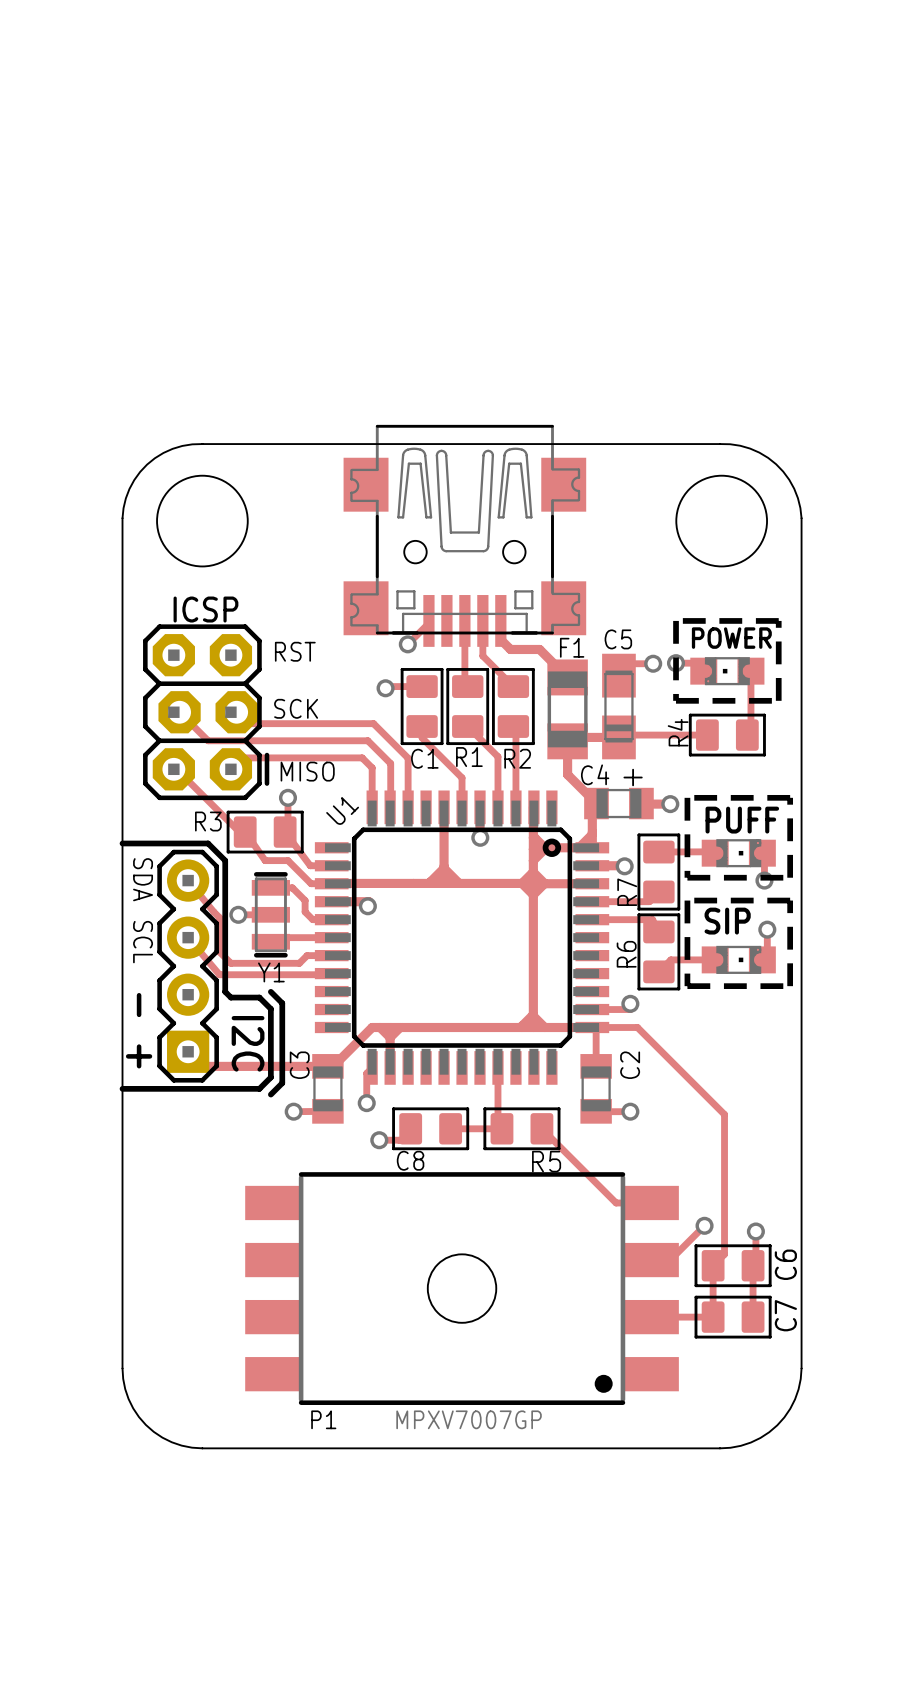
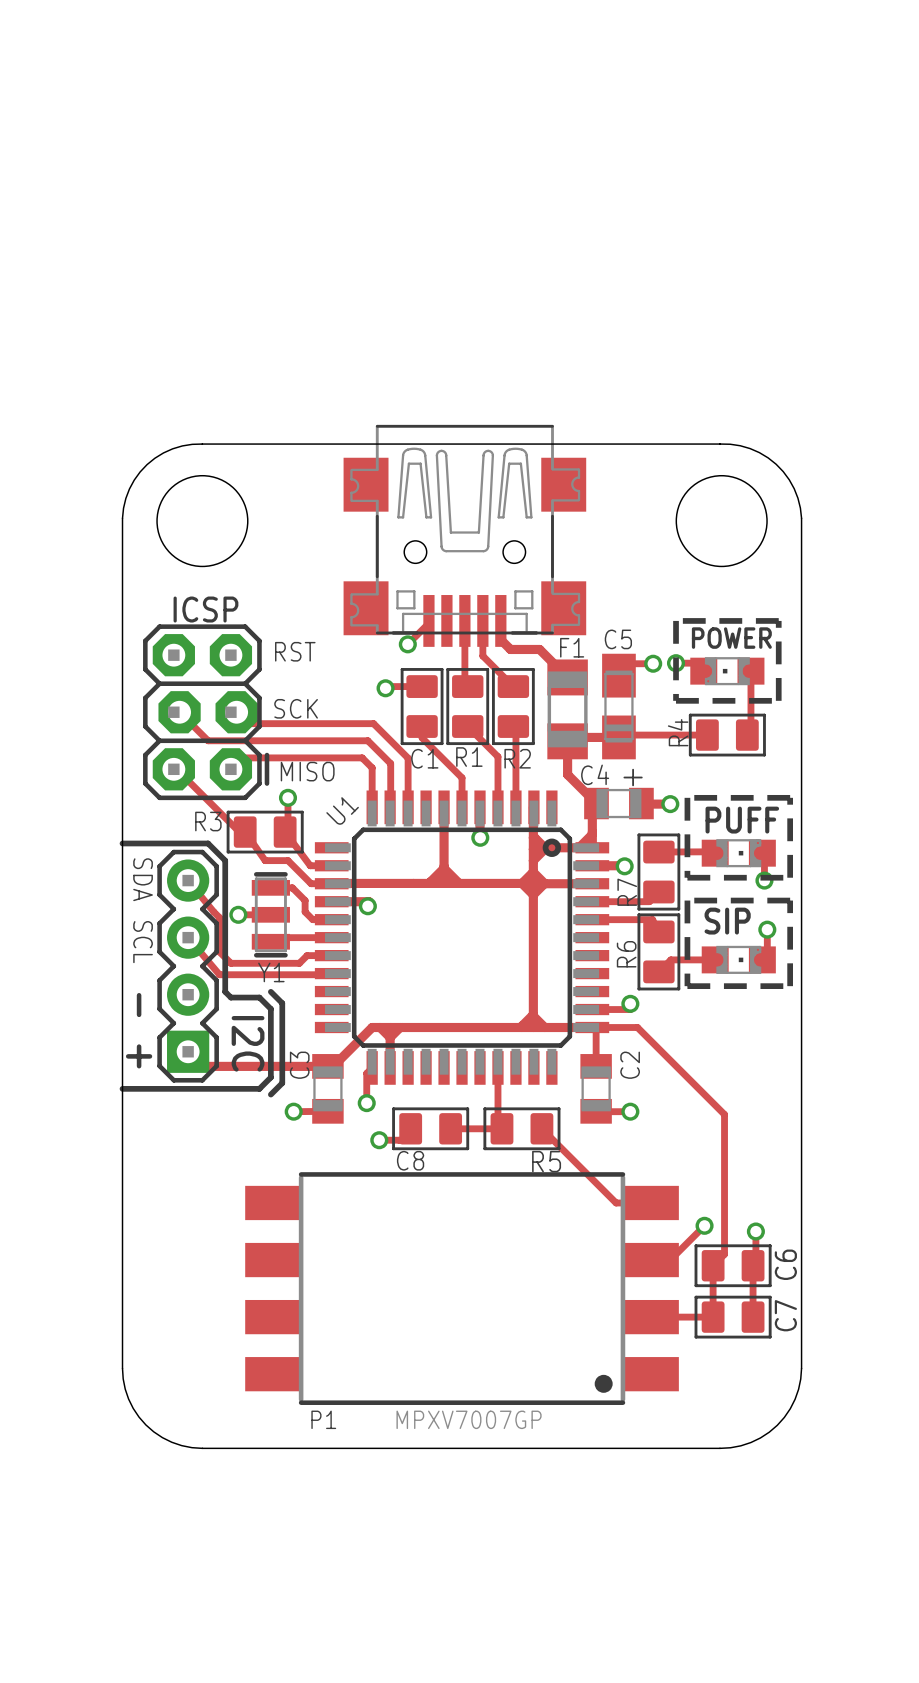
P1 footprint: [245, 1172, 679, 1405] -> [245, 1172, 679, 1405]

